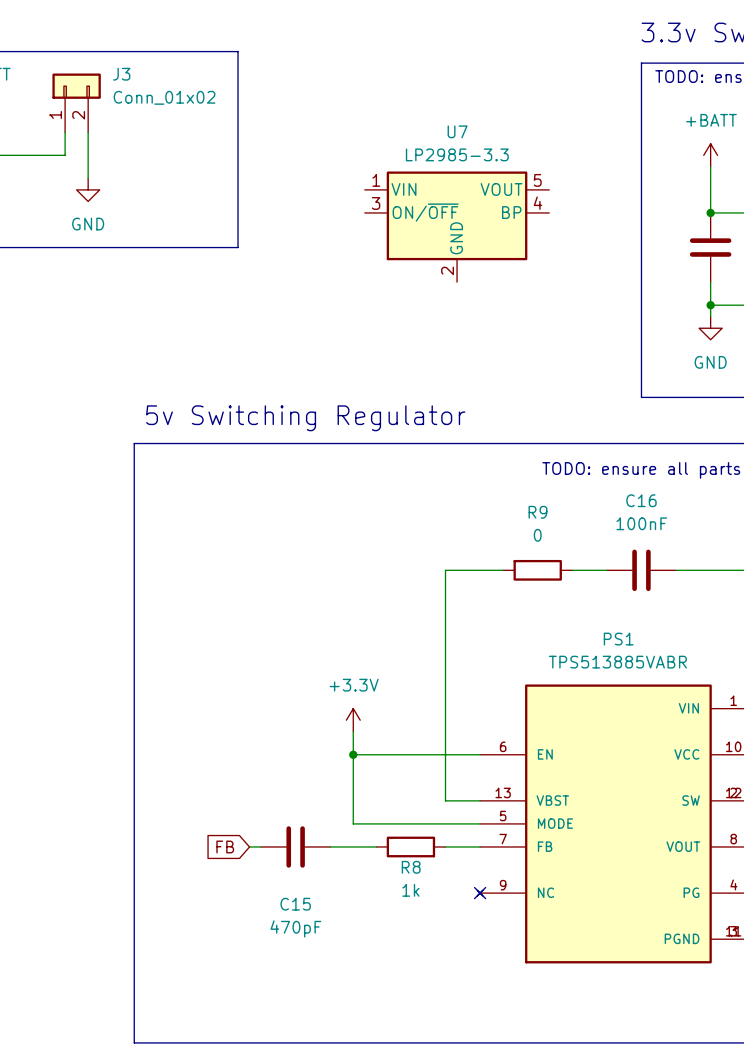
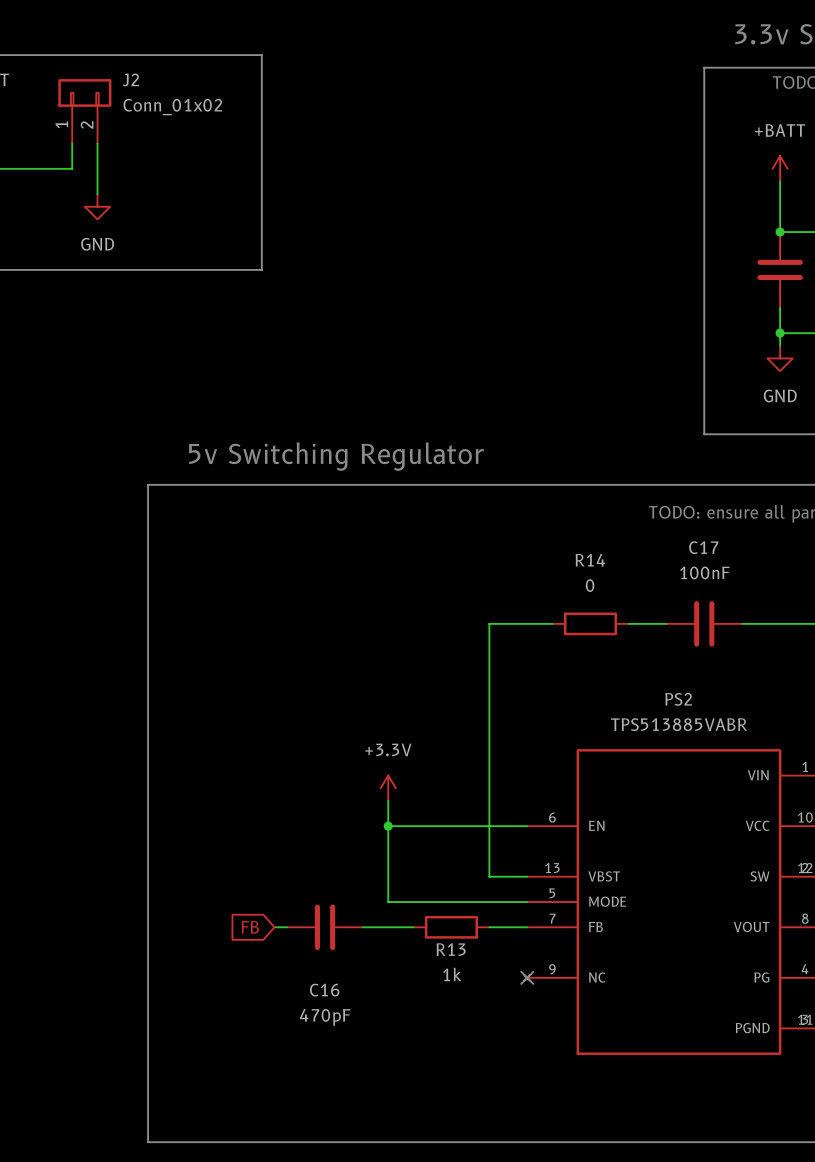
J3 name: J3 (121, 74) -> J2 (130, 79)
U7: LP2985-3.3 (457, 226) -> none
C16 name: C16 (641, 500) -> C17 (703, 547)
R9 name: R9 (538, 512) -> R14 (590, 560)
PS1 name: PS1 (618, 639) -> PS2 (678, 699)
R8 name: R8 (411, 867) -> R13 (451, 949)
C15 name: C15 (295, 904) -> C16 (324, 990)

